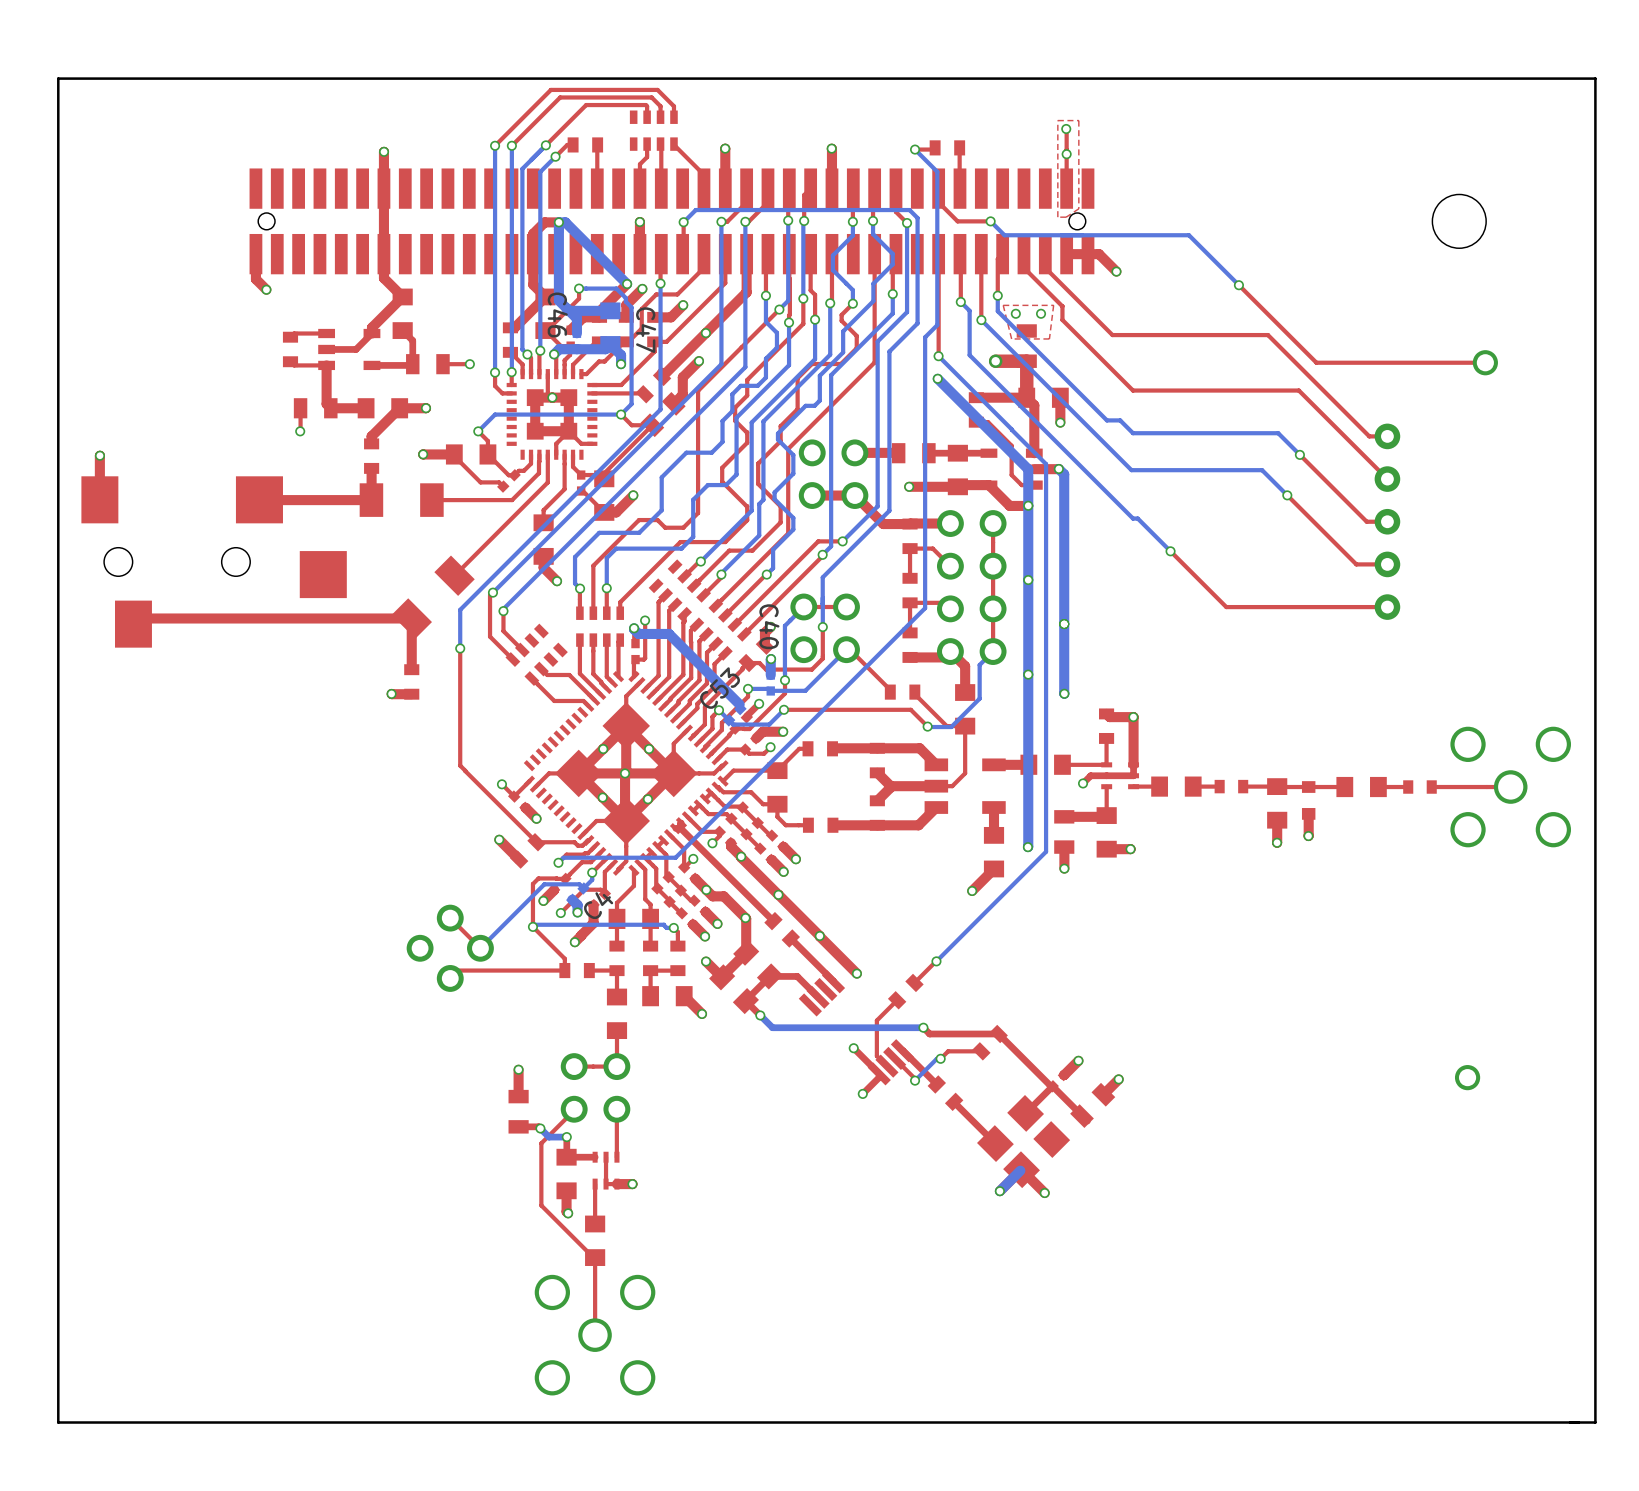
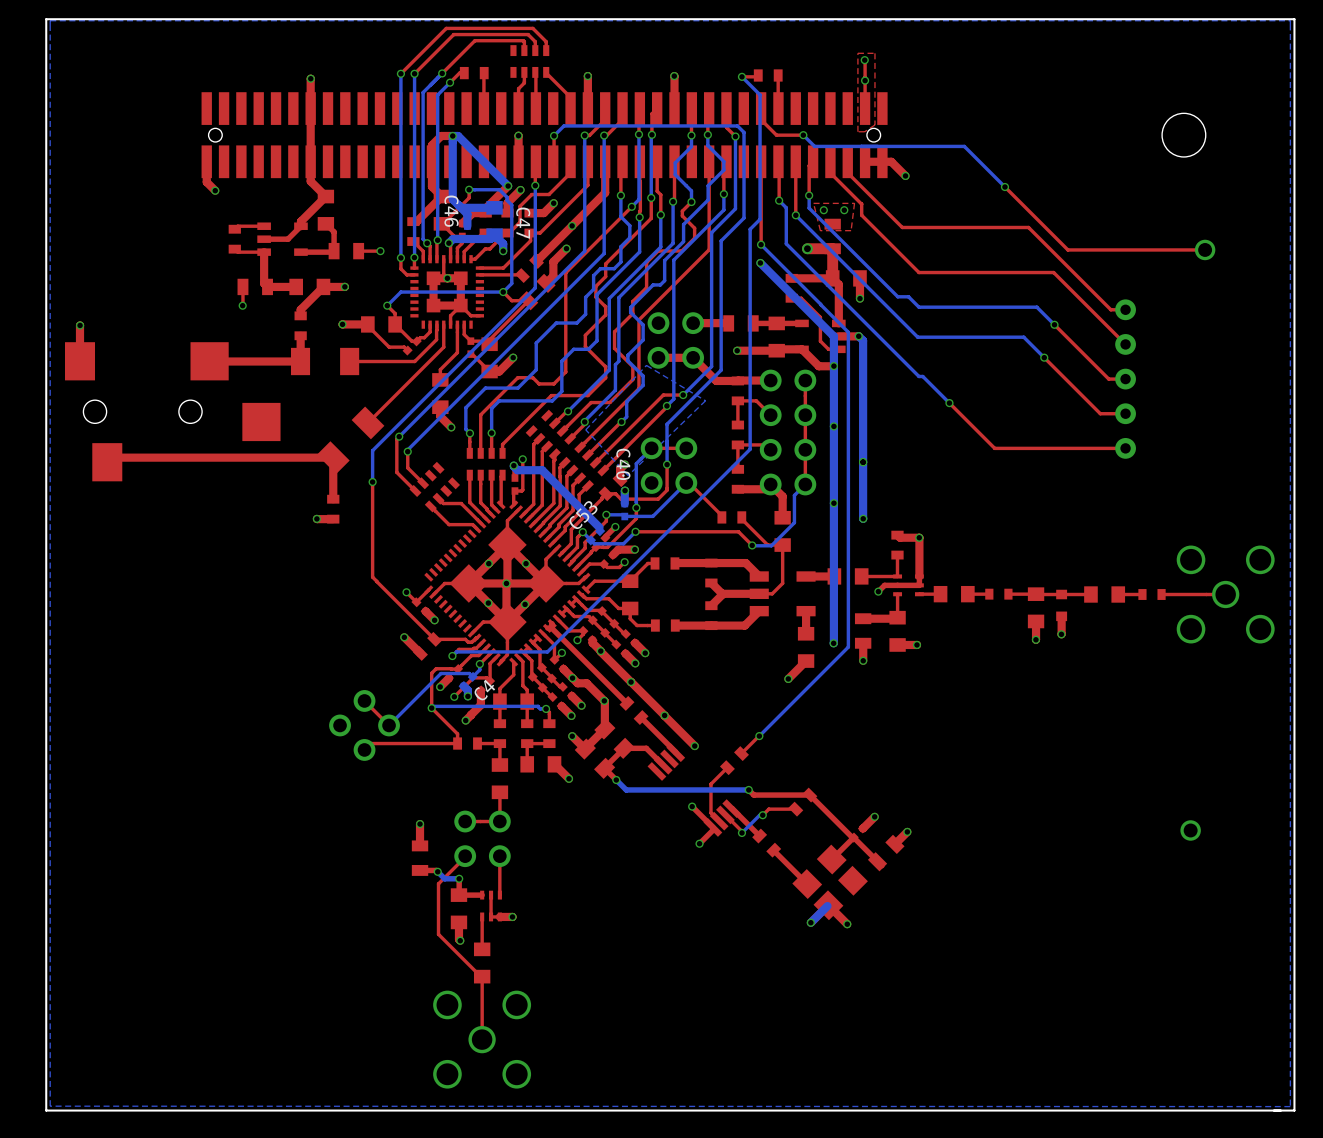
bottom zone outline: none -> (1290, 20) (1290, 1106) (50, 1106) (50, 20) (1290, 20)
bottom zone outline: none -> (646, 365) (585, 429) (628, 475) (705, 400) (646, 365)

